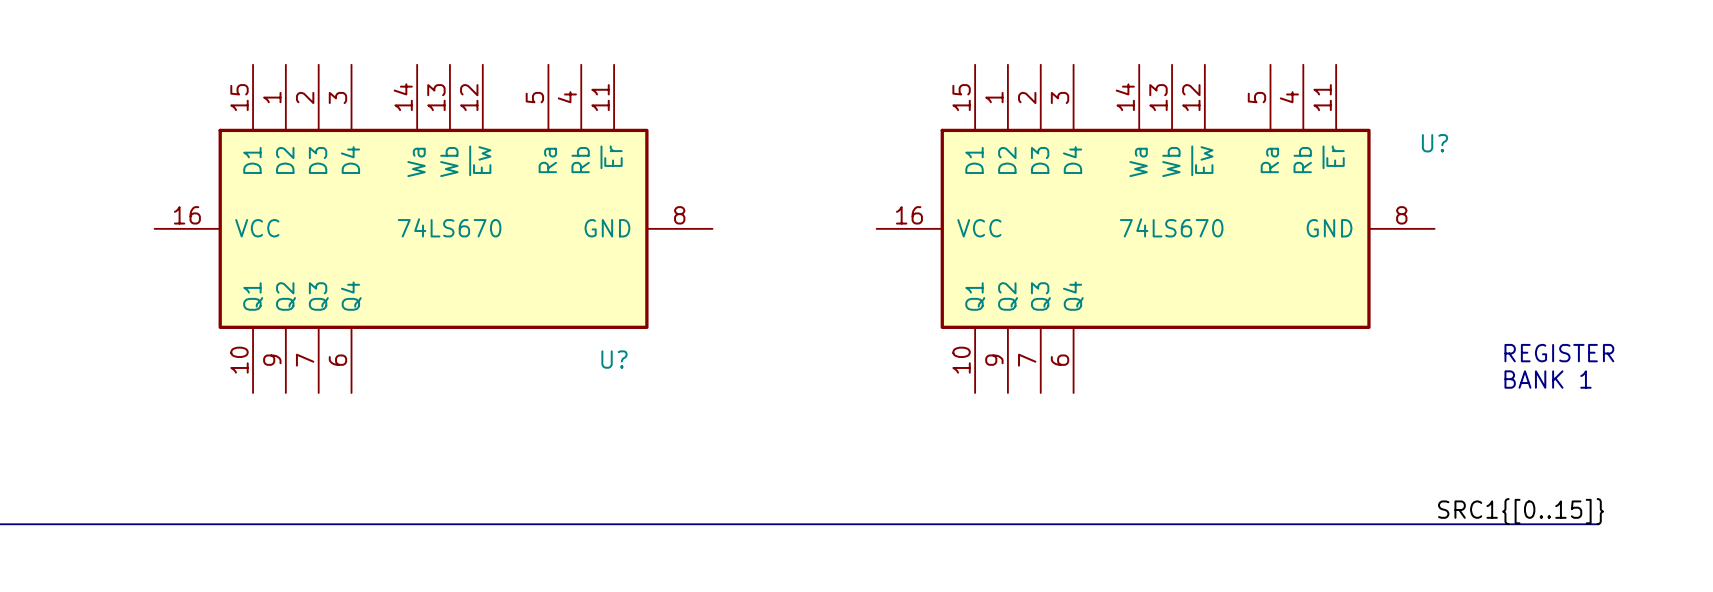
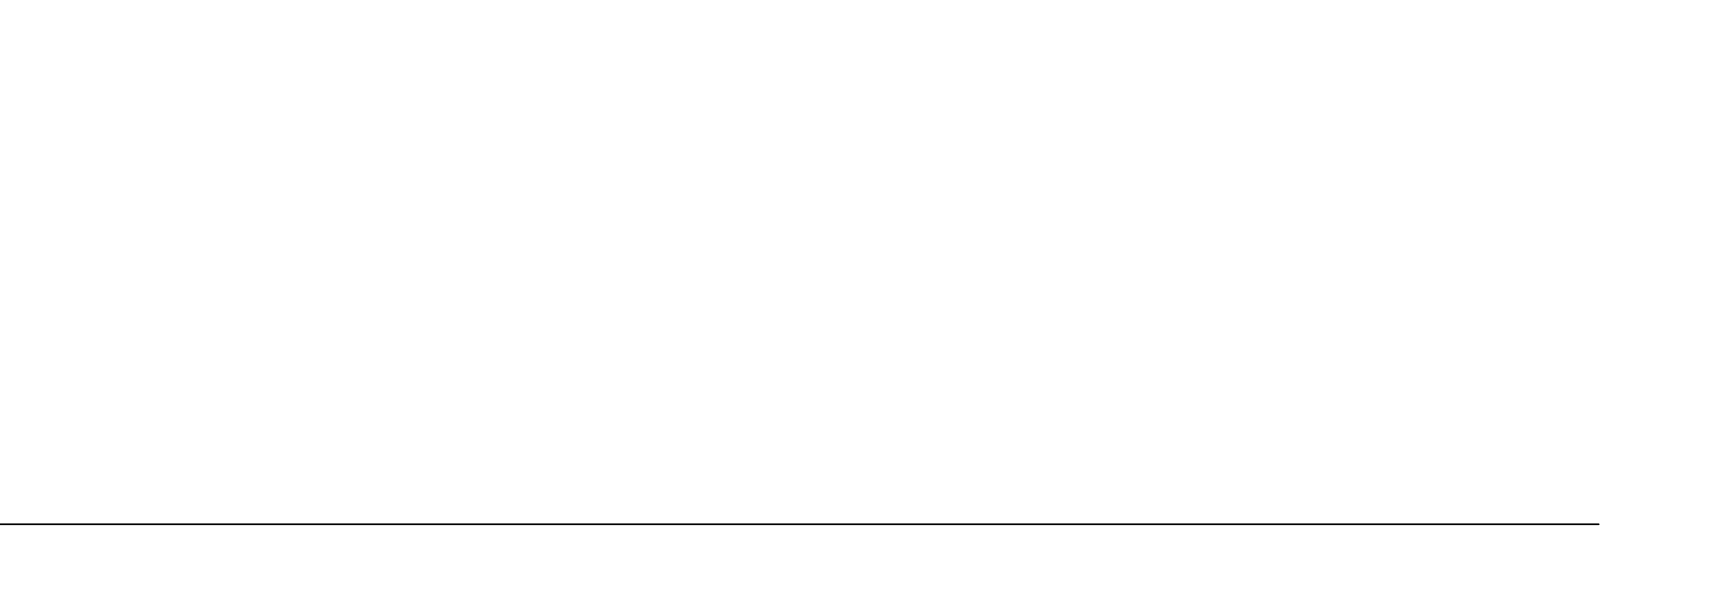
U?: 74LS670 (433, 228) -> none
U?: 74LS670 (1155, 228) -> none
text: REGISTER (1559, 353) -> none
text: BANK 1 (1548, 379) -> none
label: SRC1{[0..15]} (1521, 511) -> none

